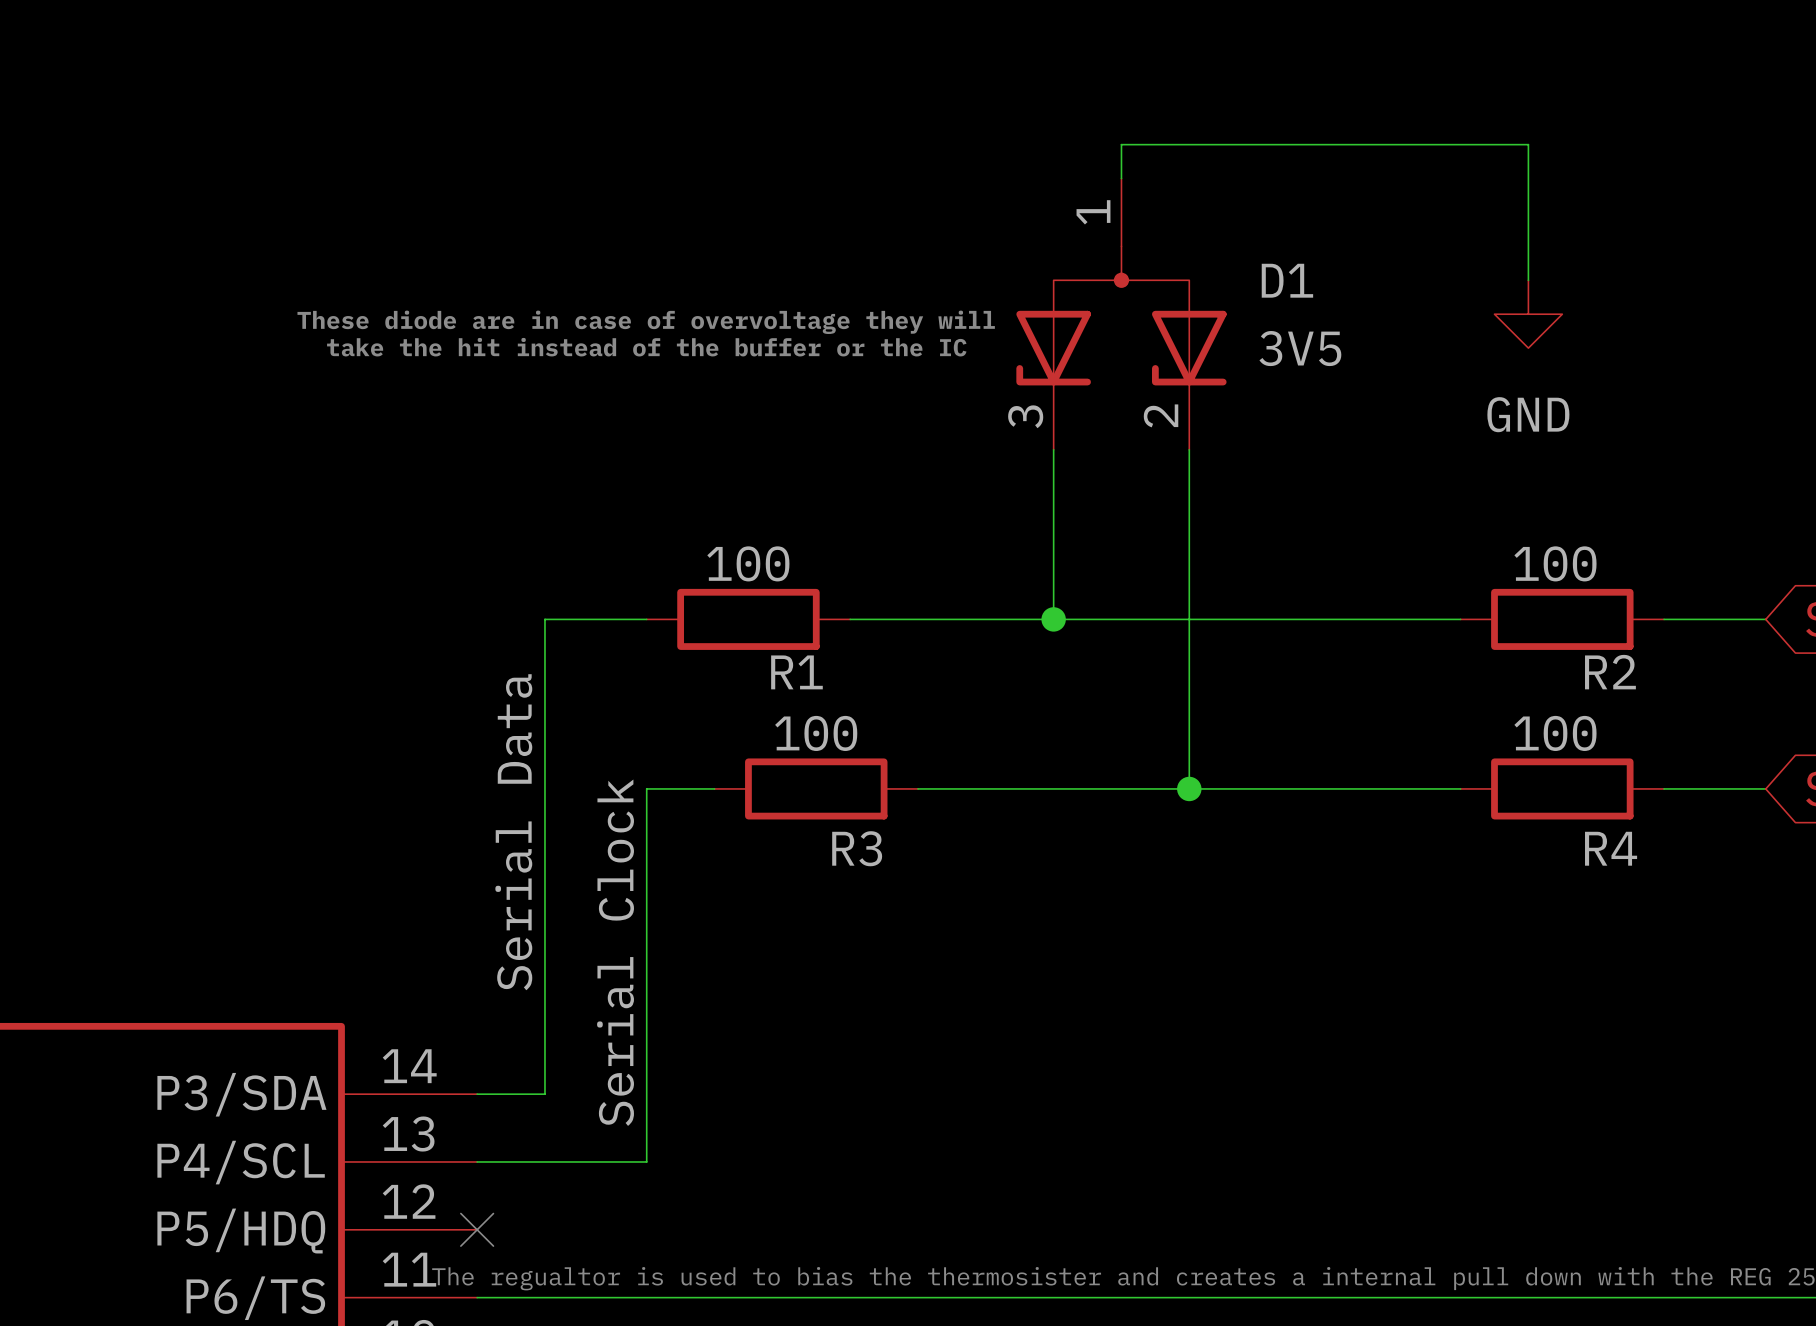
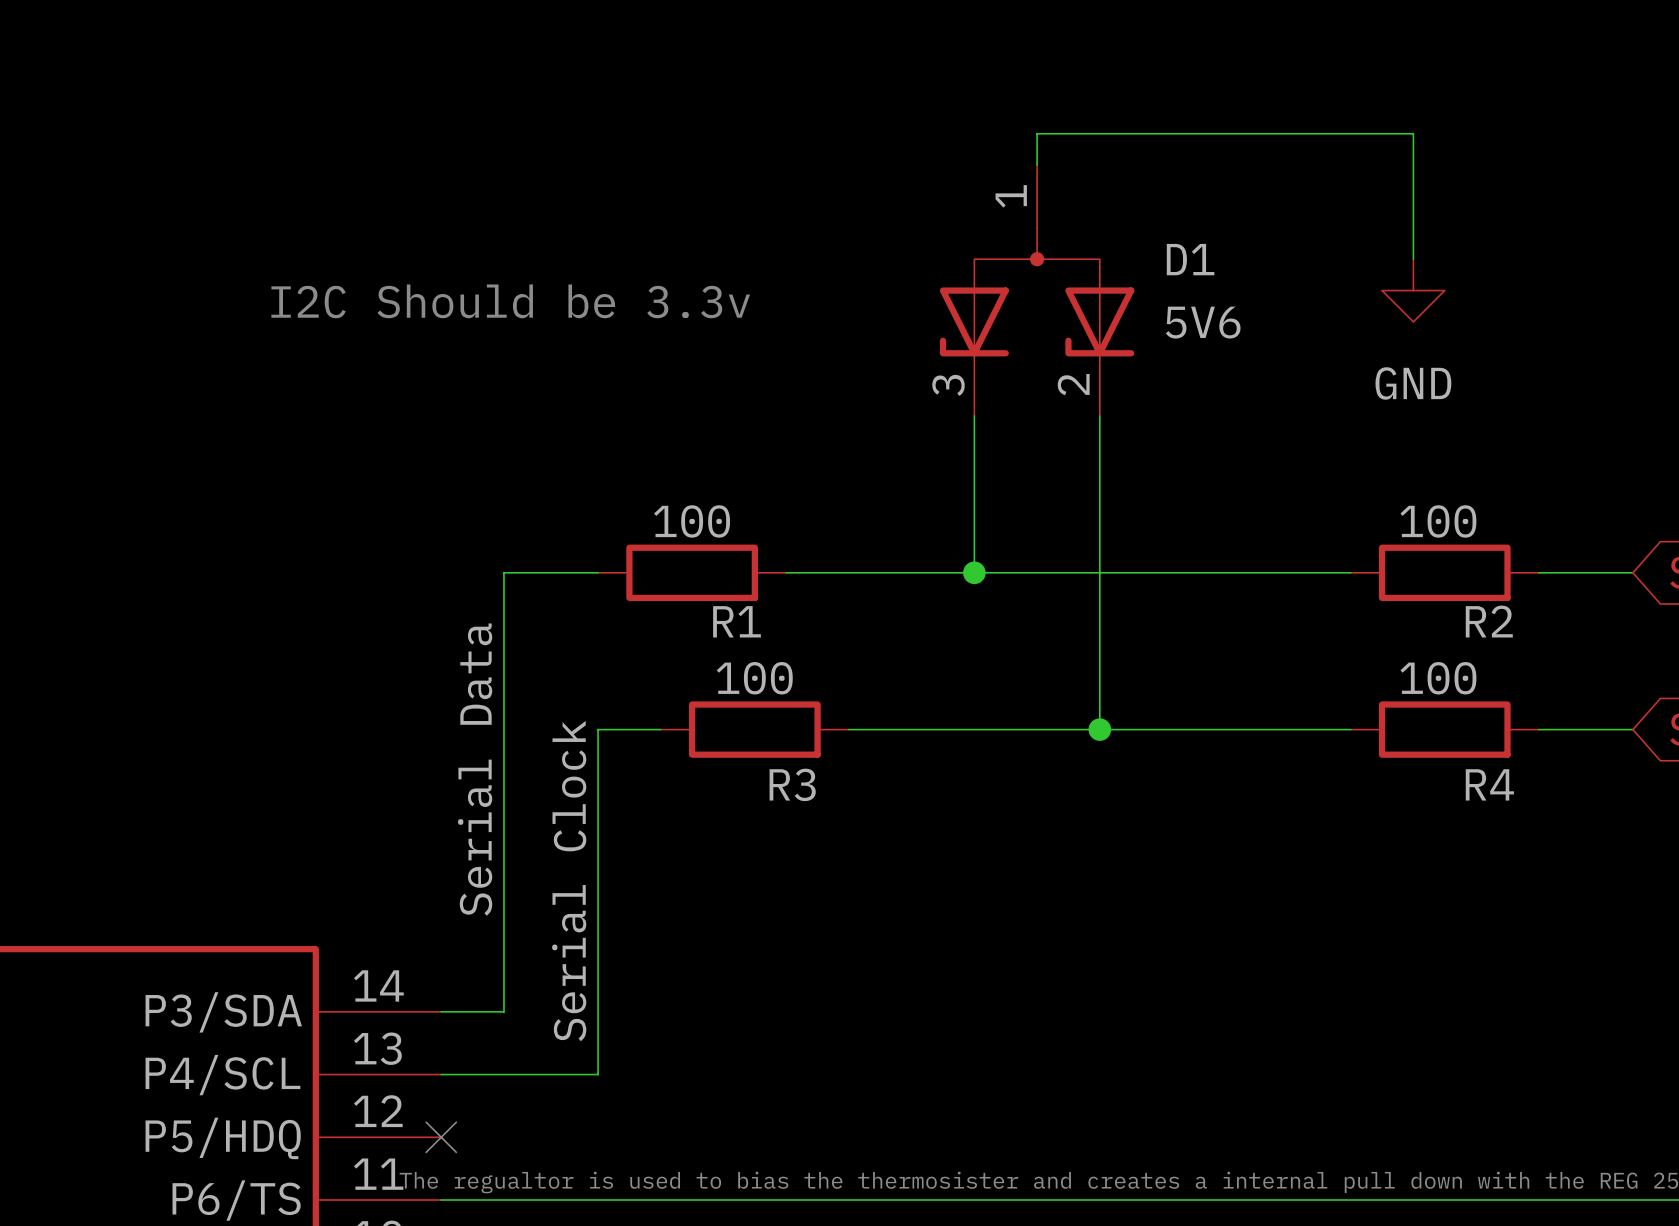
text: These diode are in case of overvoltage they will (646, 322) -> none
text: none -> I2C Should be 3.3v (510, 301)
text: take the hit instead of the buffer or the IC (646, 347) -> none
D1 value: 3V5 (1300, 348) -> 5V6 (1203, 322)

